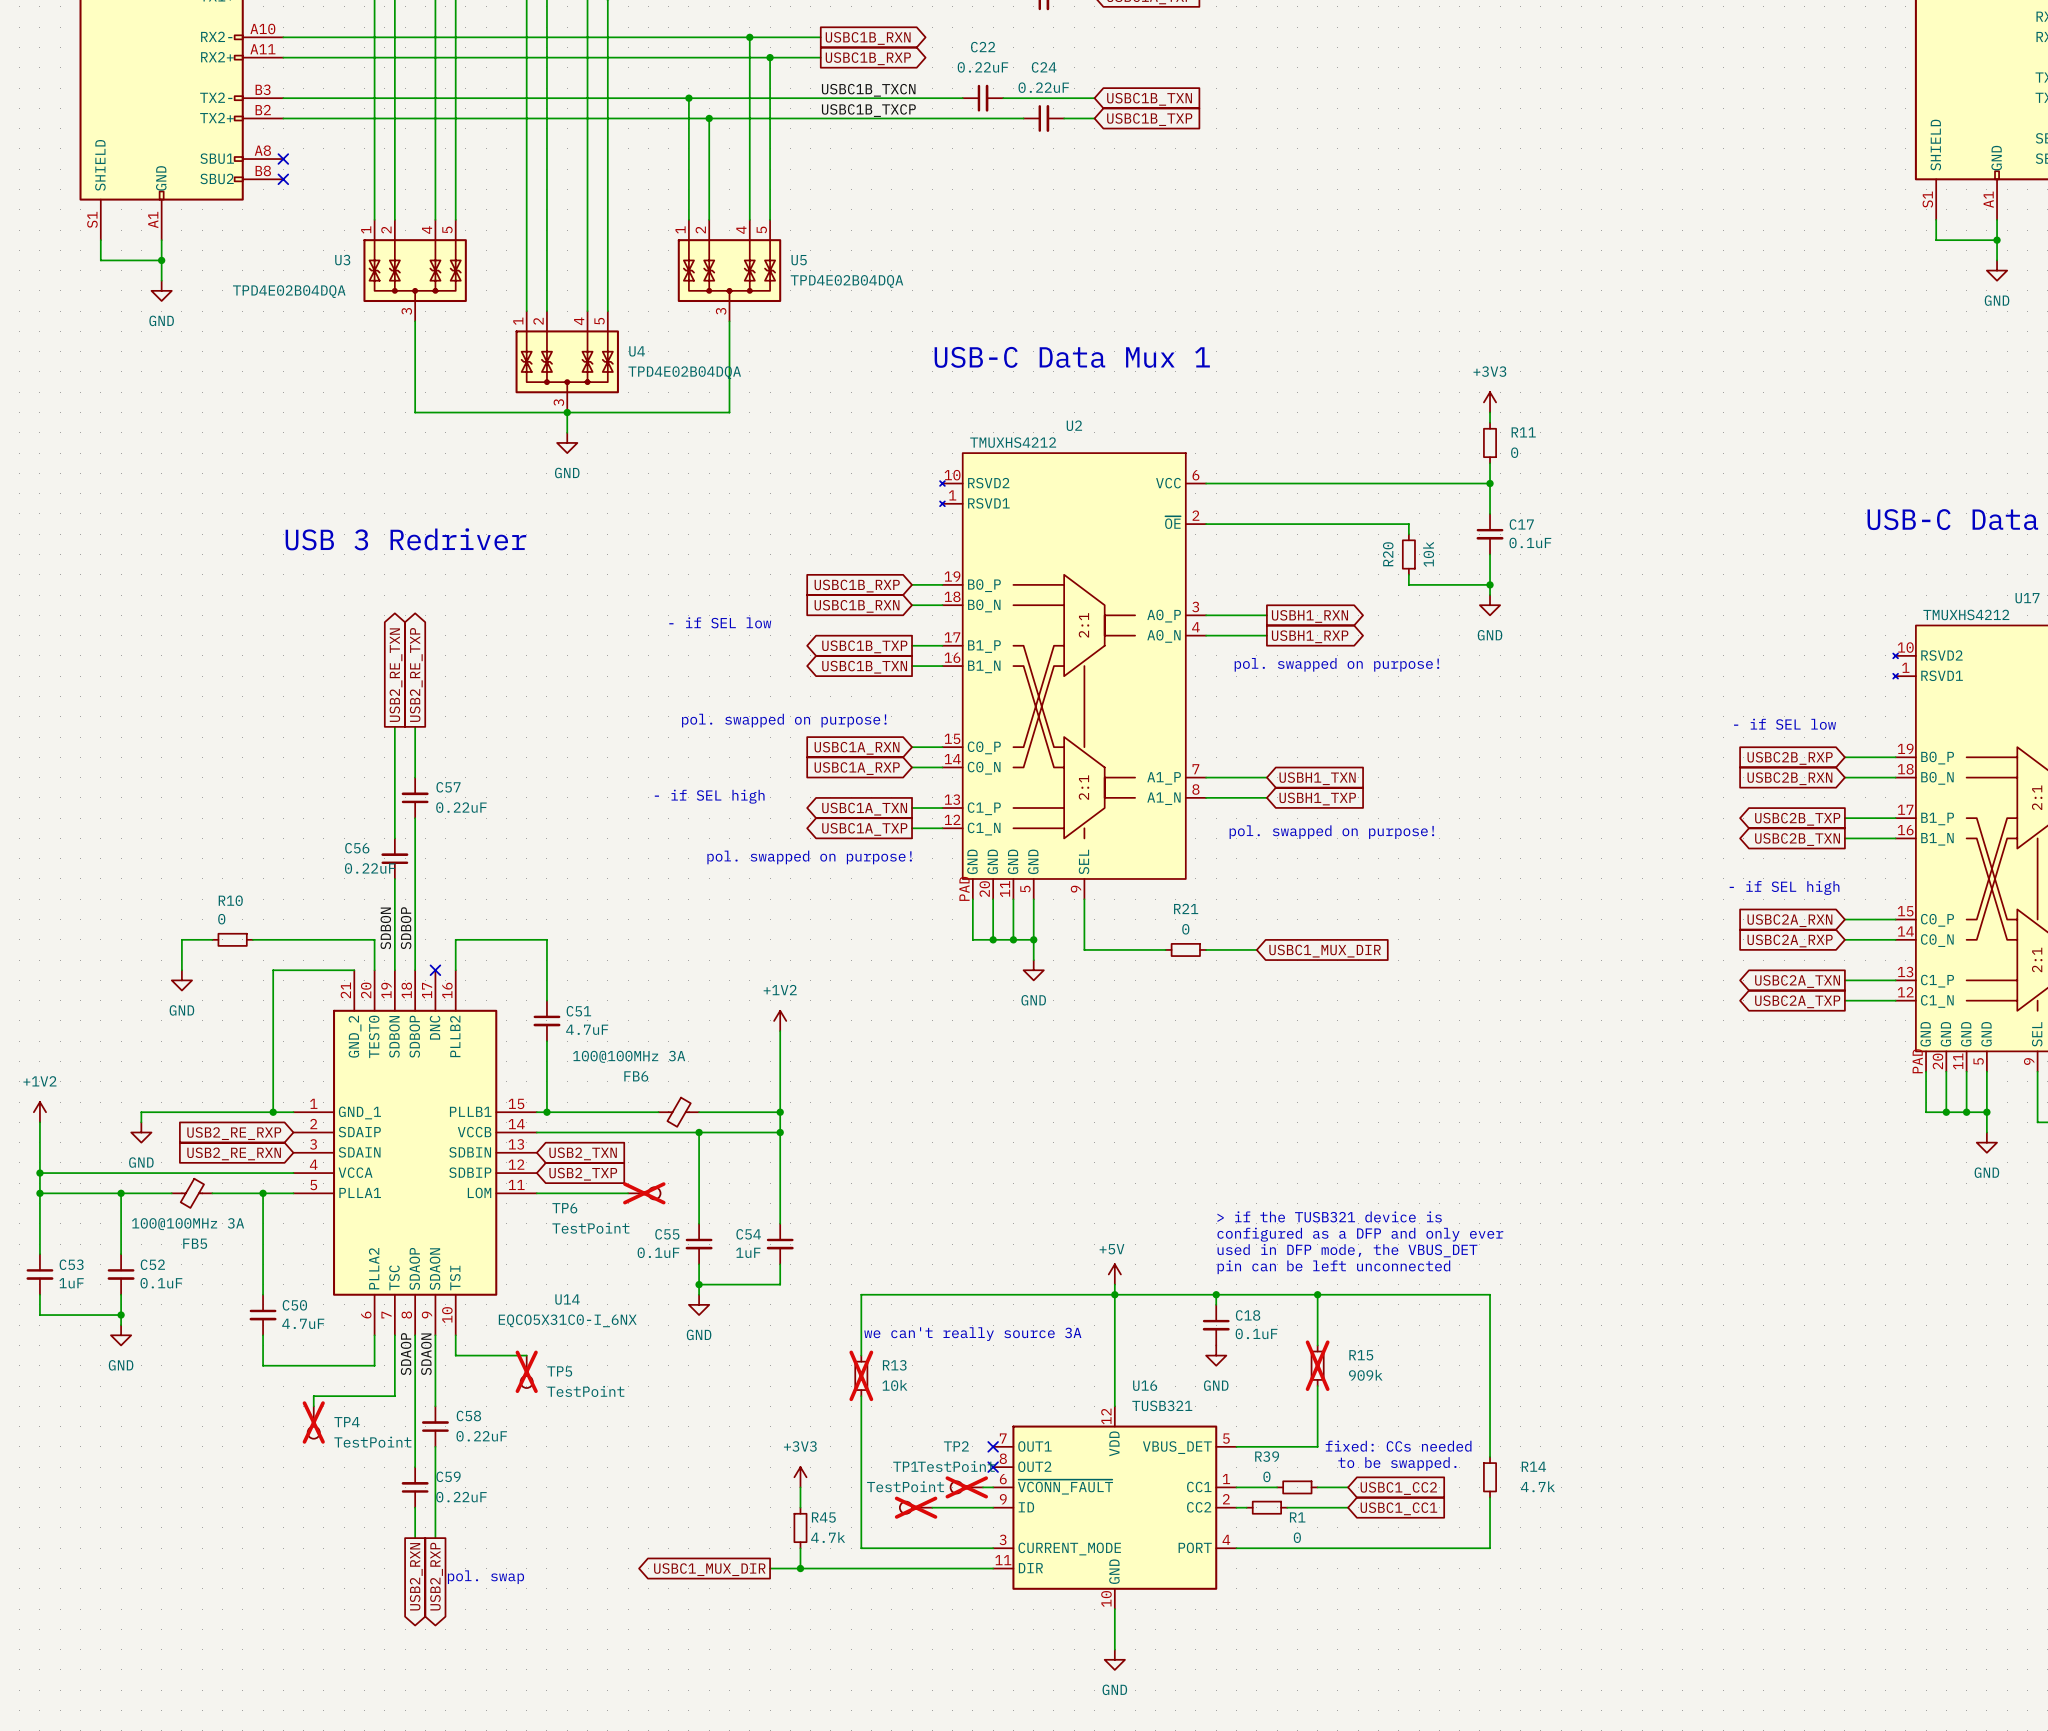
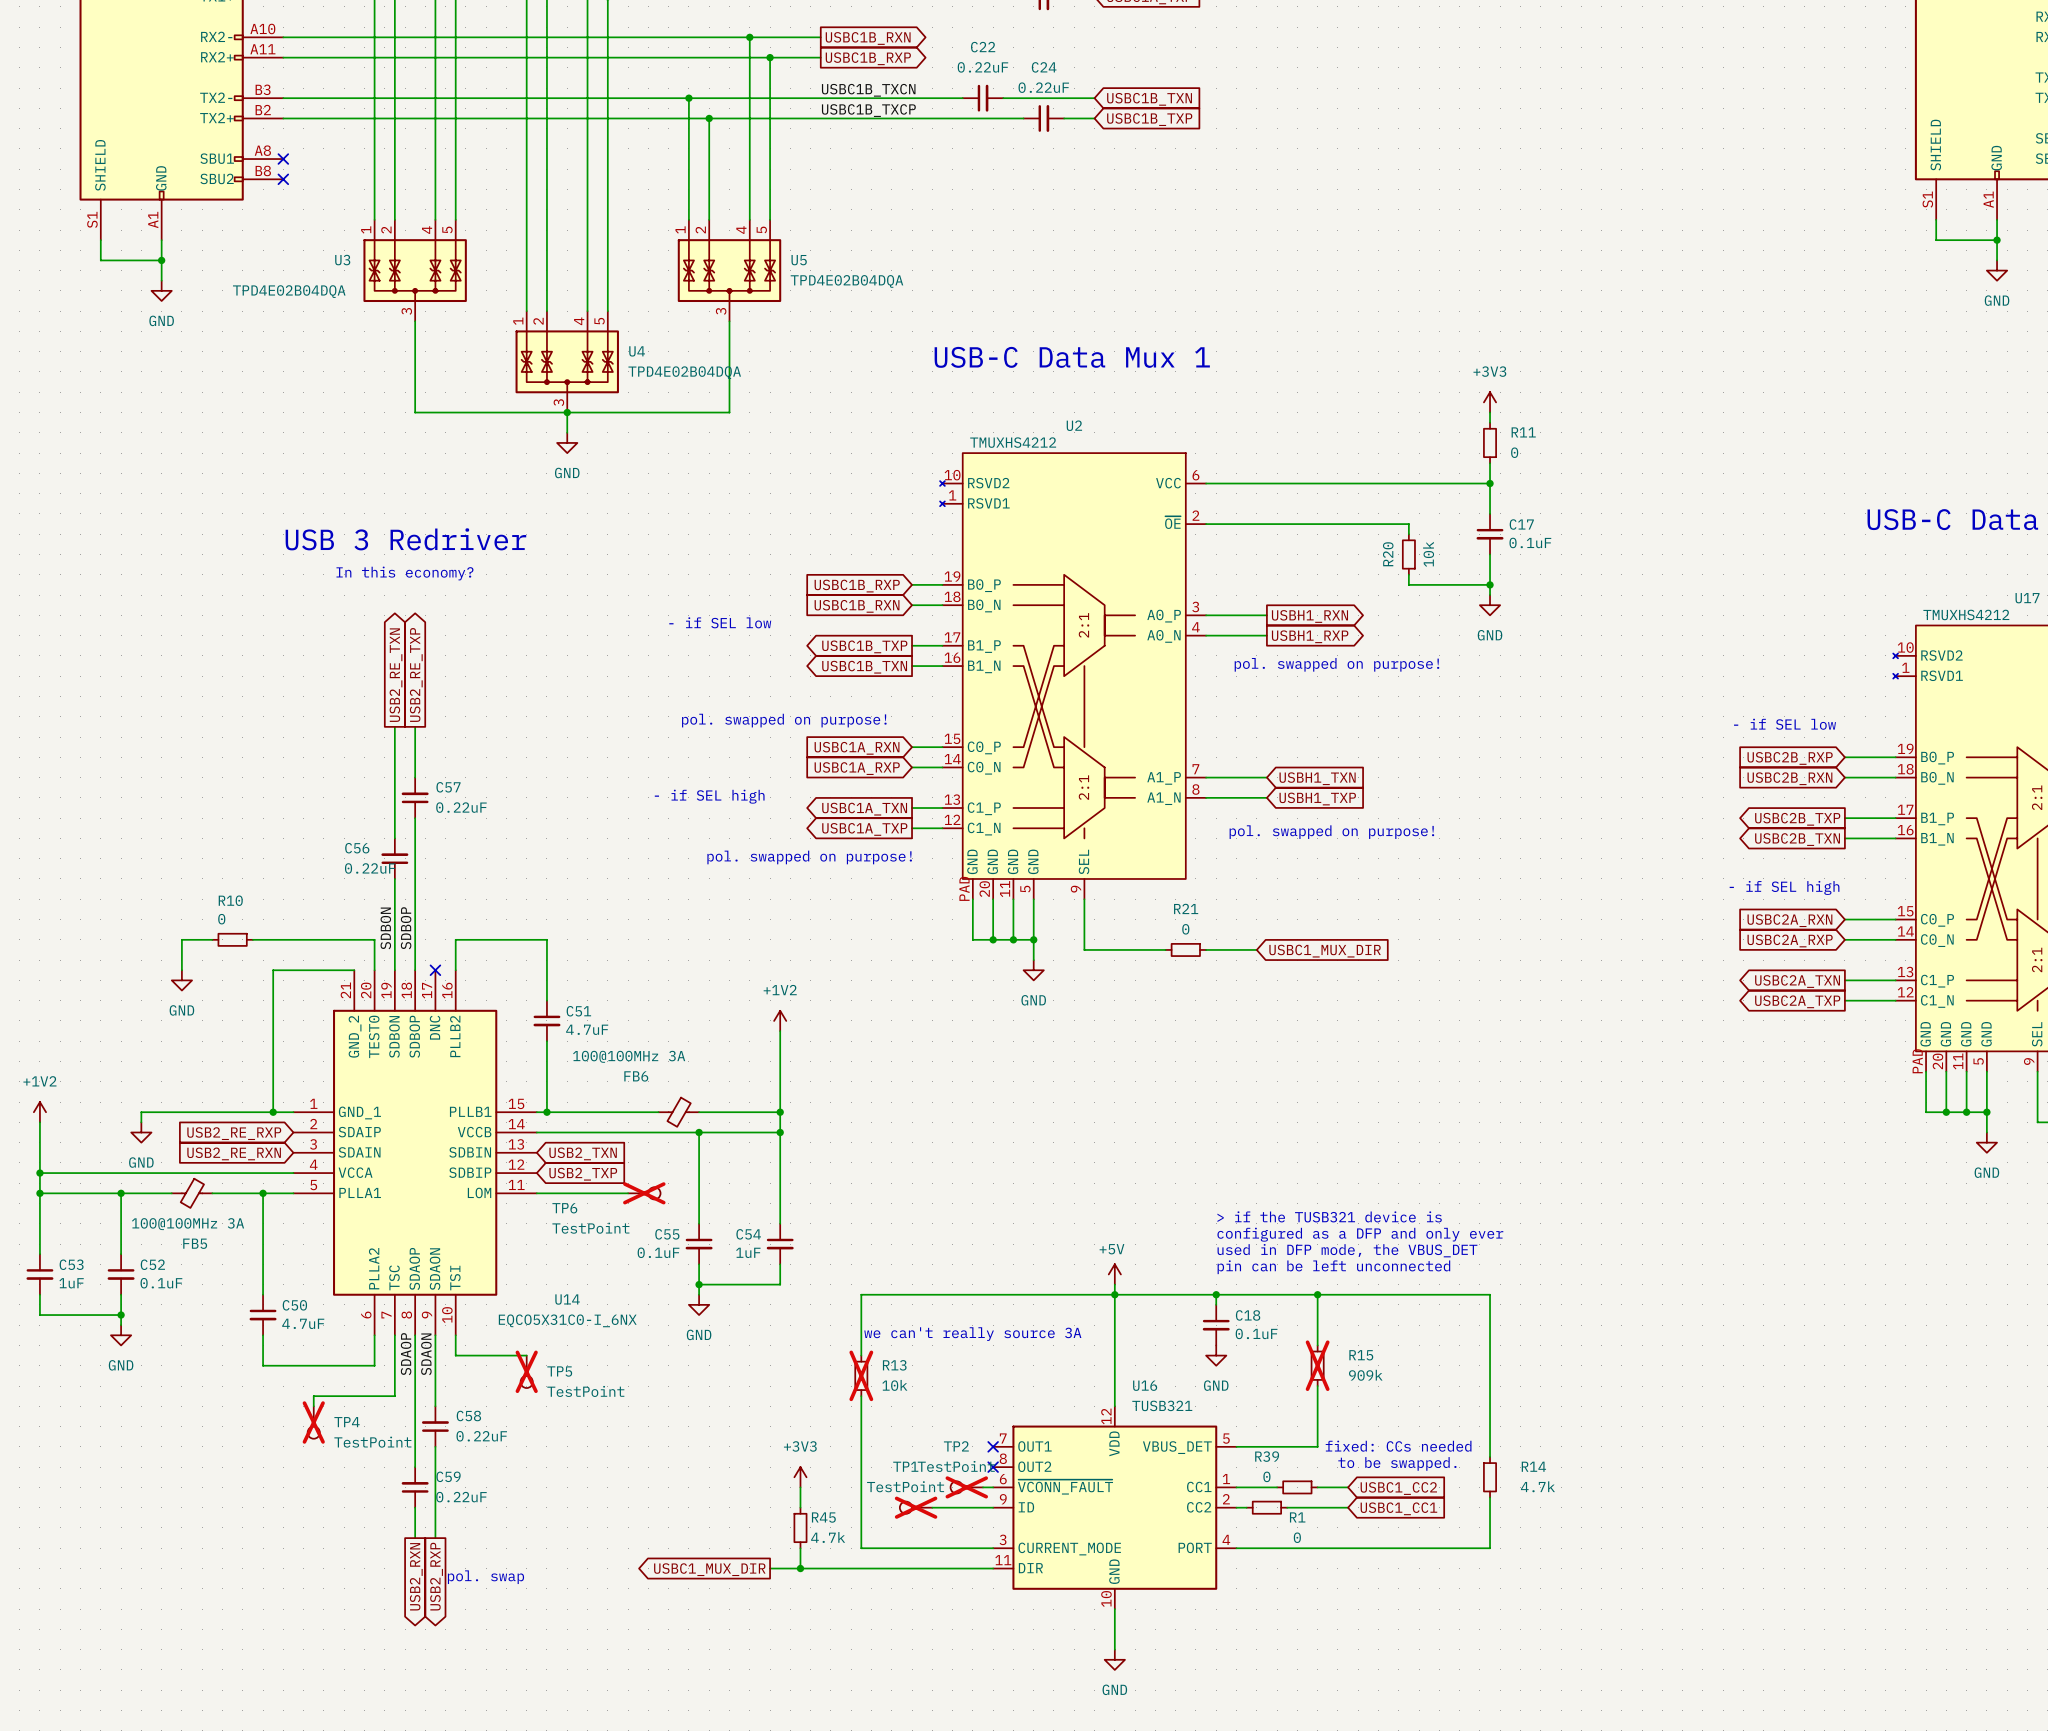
text: none -> In this economy? (404, 573)

